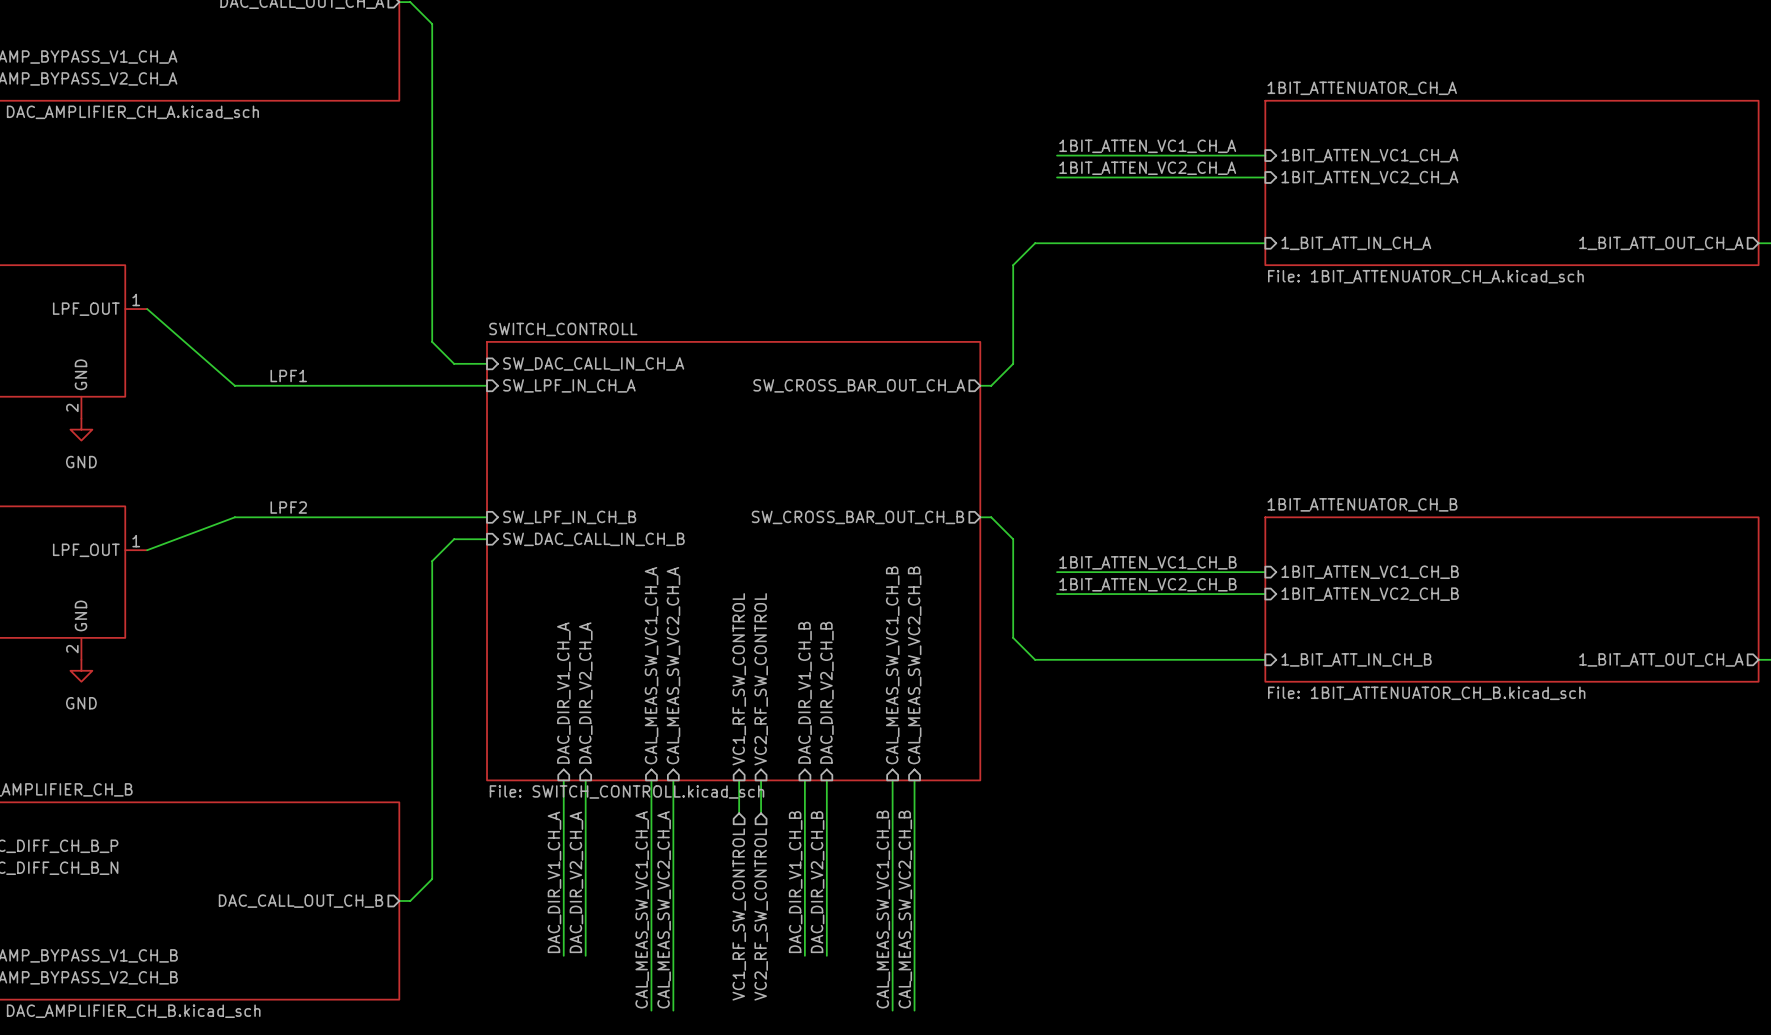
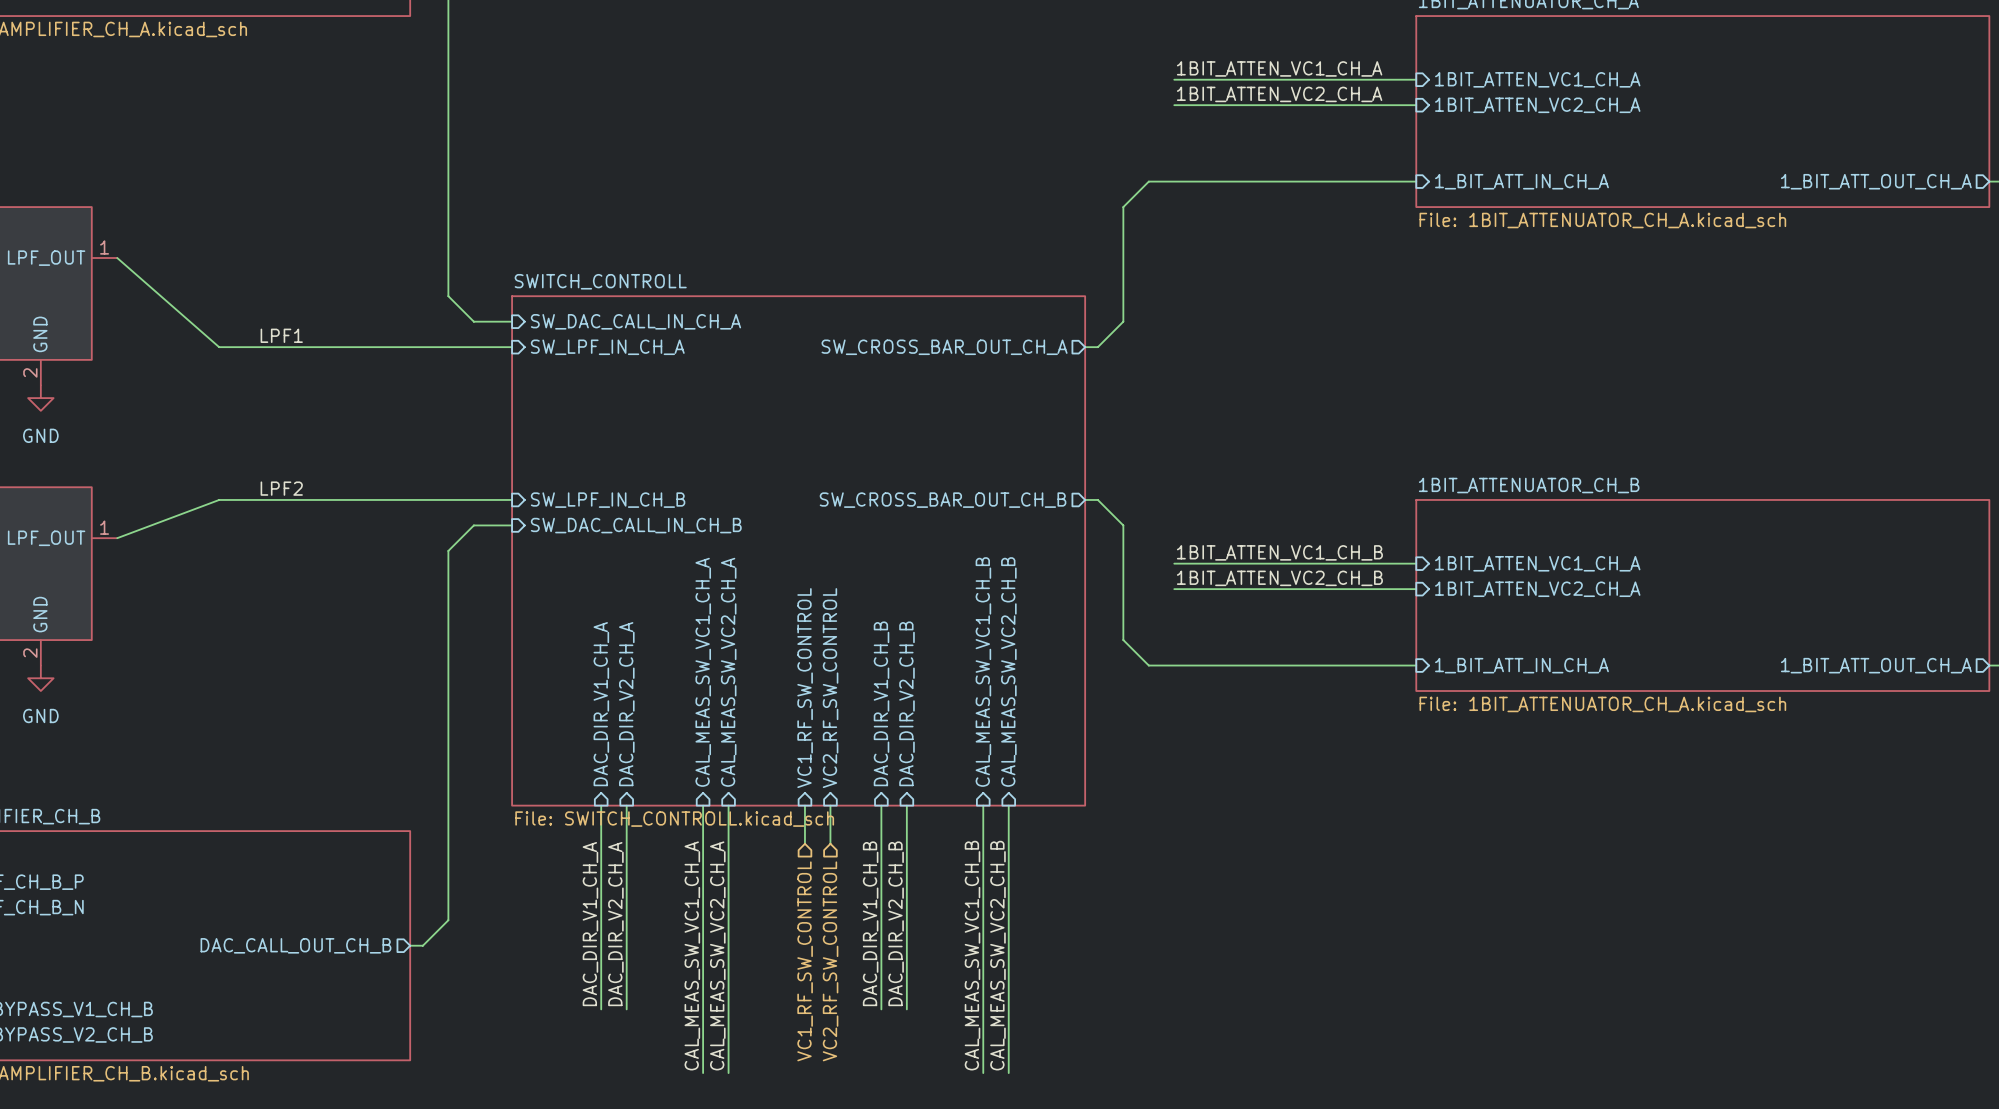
sheet pin: 1BIT_ATTEN_VC1_CH_B (1370, 572) -> 1BIT_ATTEN_VC1_CH_A (1537, 563)
sheet pin: 1BIT_ATTEN_VC2_CH_B (1370, 594) -> 1BIT_ATTEN_VC2_CH_A (1537, 589)
sheet pin: 1_BIT_ATT_IN_CH_B (1356, 659) -> 1_BIT_ATT_IN_CH_A (1521, 665)
sheet 1BIT_ATTENUATOR_CH_B value: File: 1BIT_ATTENUATOR_CH_B.kicad_sch (1426, 693) -> File: 1BIT_ATTENUATOR_CH_A.kicad_sch (1602, 704)

